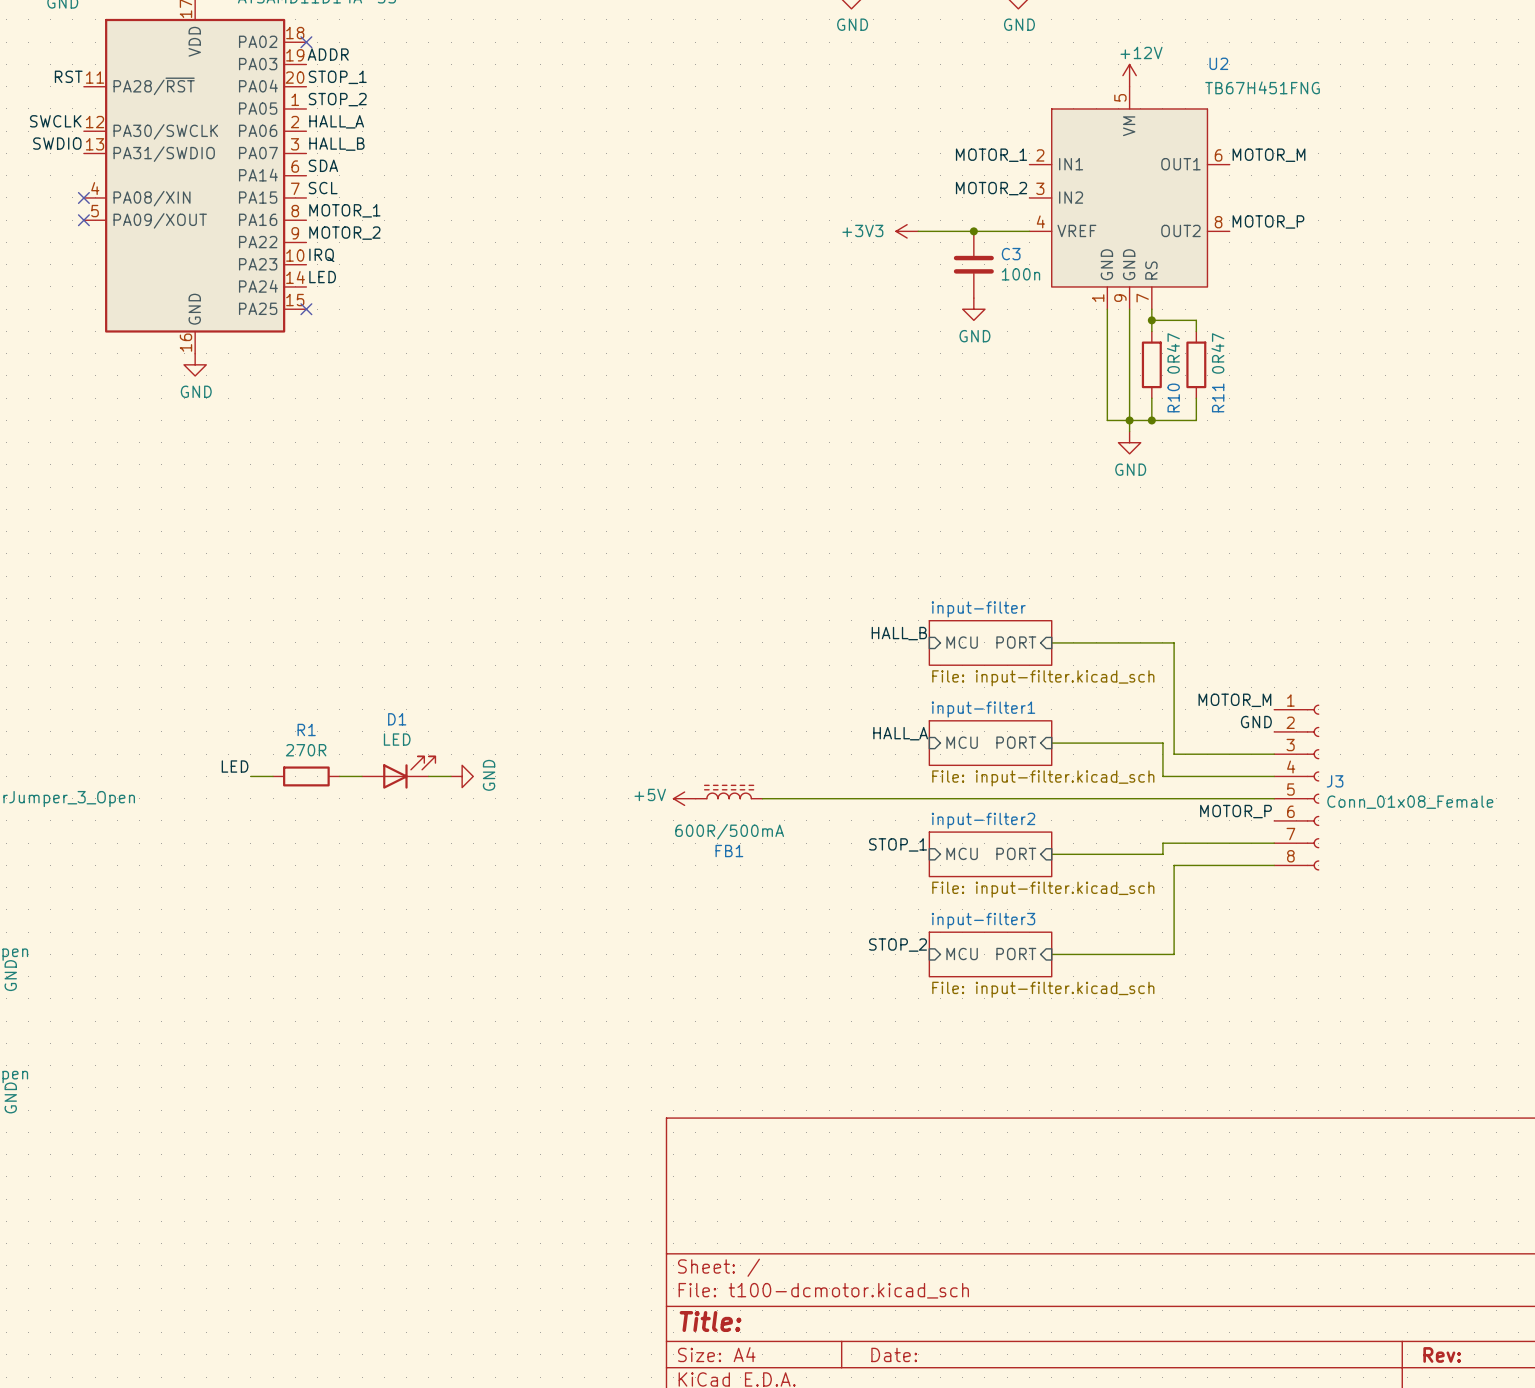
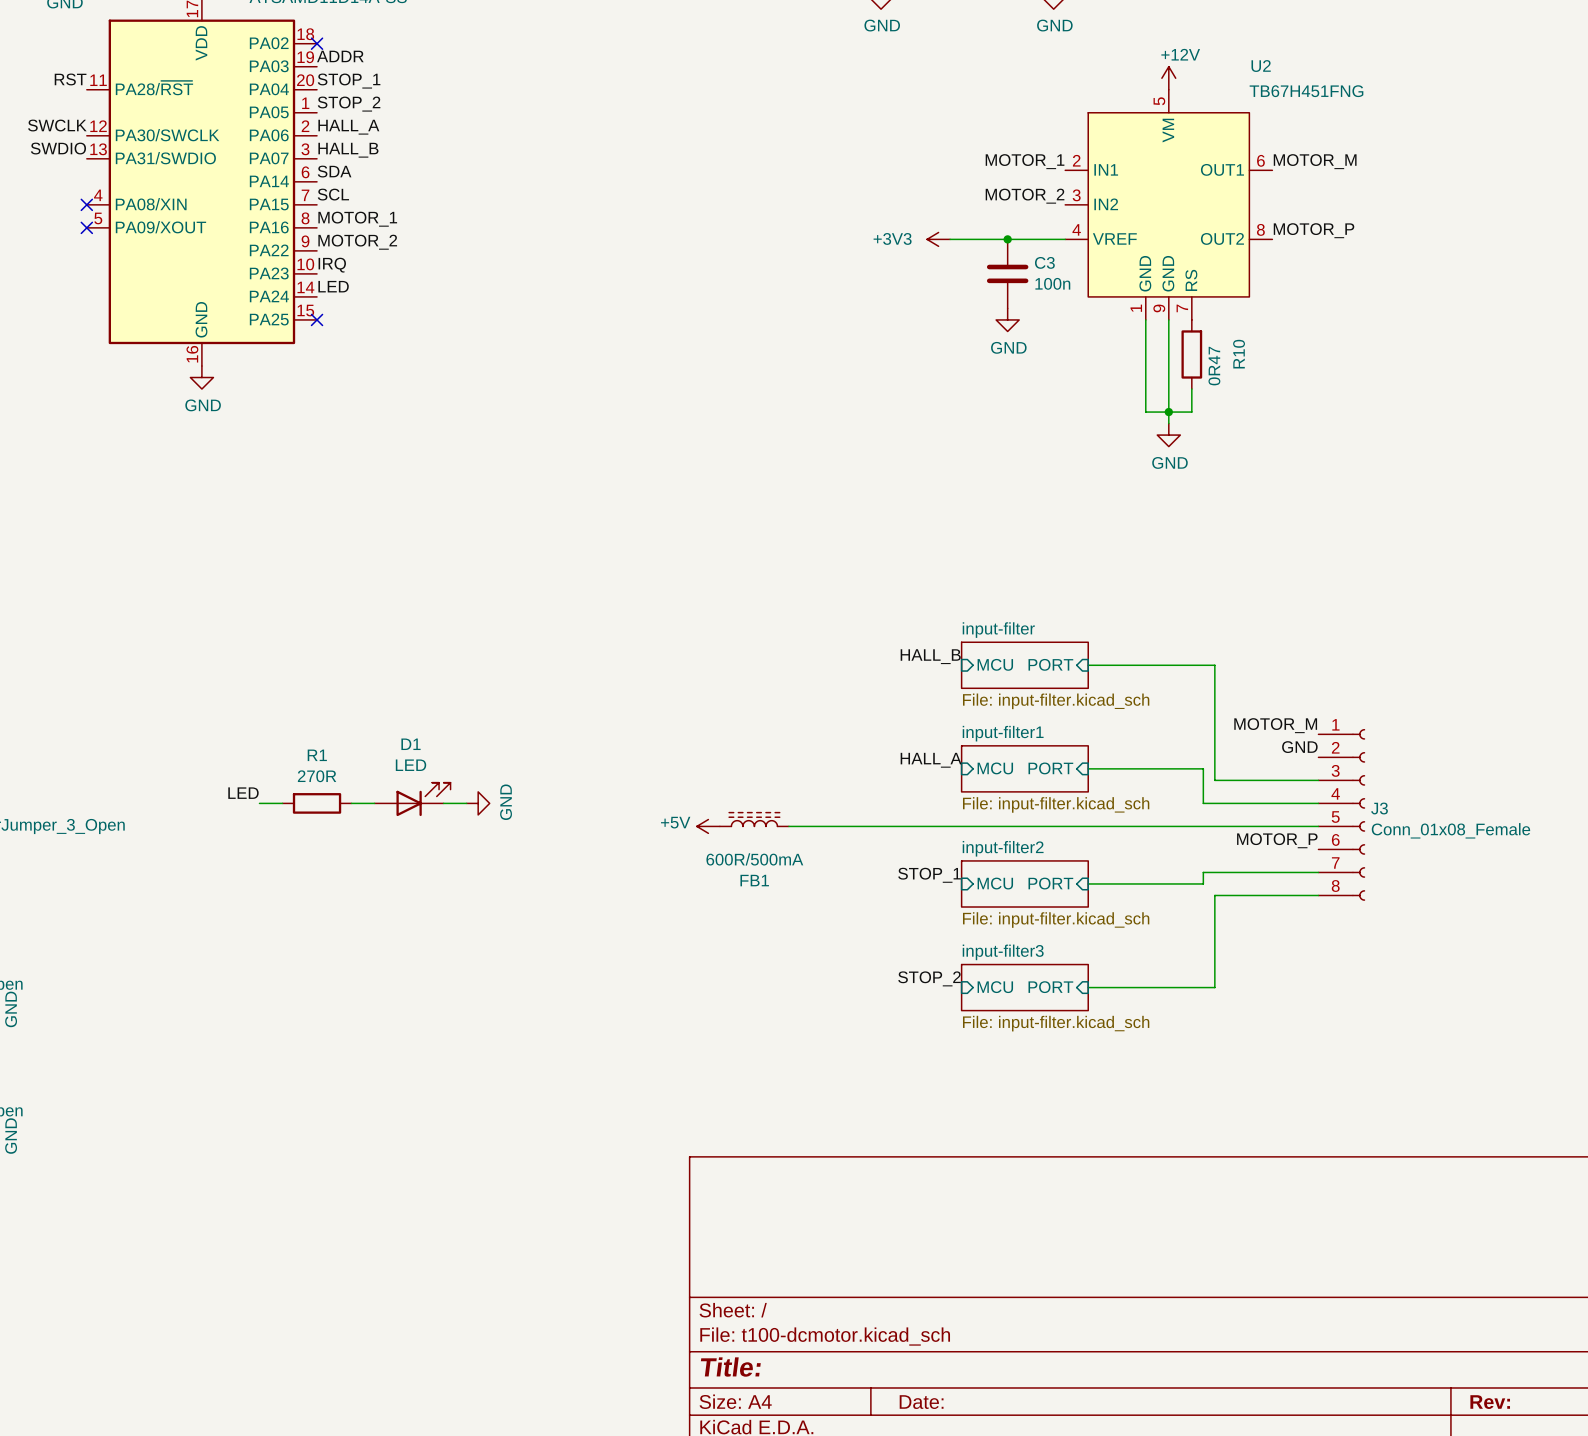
wire: (1151, 320) (1196, 320) (1196, 331) -> none
junction: (1151, 320) -> none
R10 position: (1151, 364) -> (1191, 354)
R11: 0R47 (1196, 364) -> none
R10 name position: R10 (1173, 397) -> R10 (1239, 354)
wire: (1107, 398) (1107, 420) (1196, 420) (1196, 398) -> (1145, 412) (1191, 412) (1191, 389)
junction: none -> (1168, 412)
wire: (1151, 398) (1151, 420) -> none
junction: (1129, 420) -> none
junction: (1151, 420) -> none
power symbol position: GND (1129, 442) -> GND (1168, 435)

